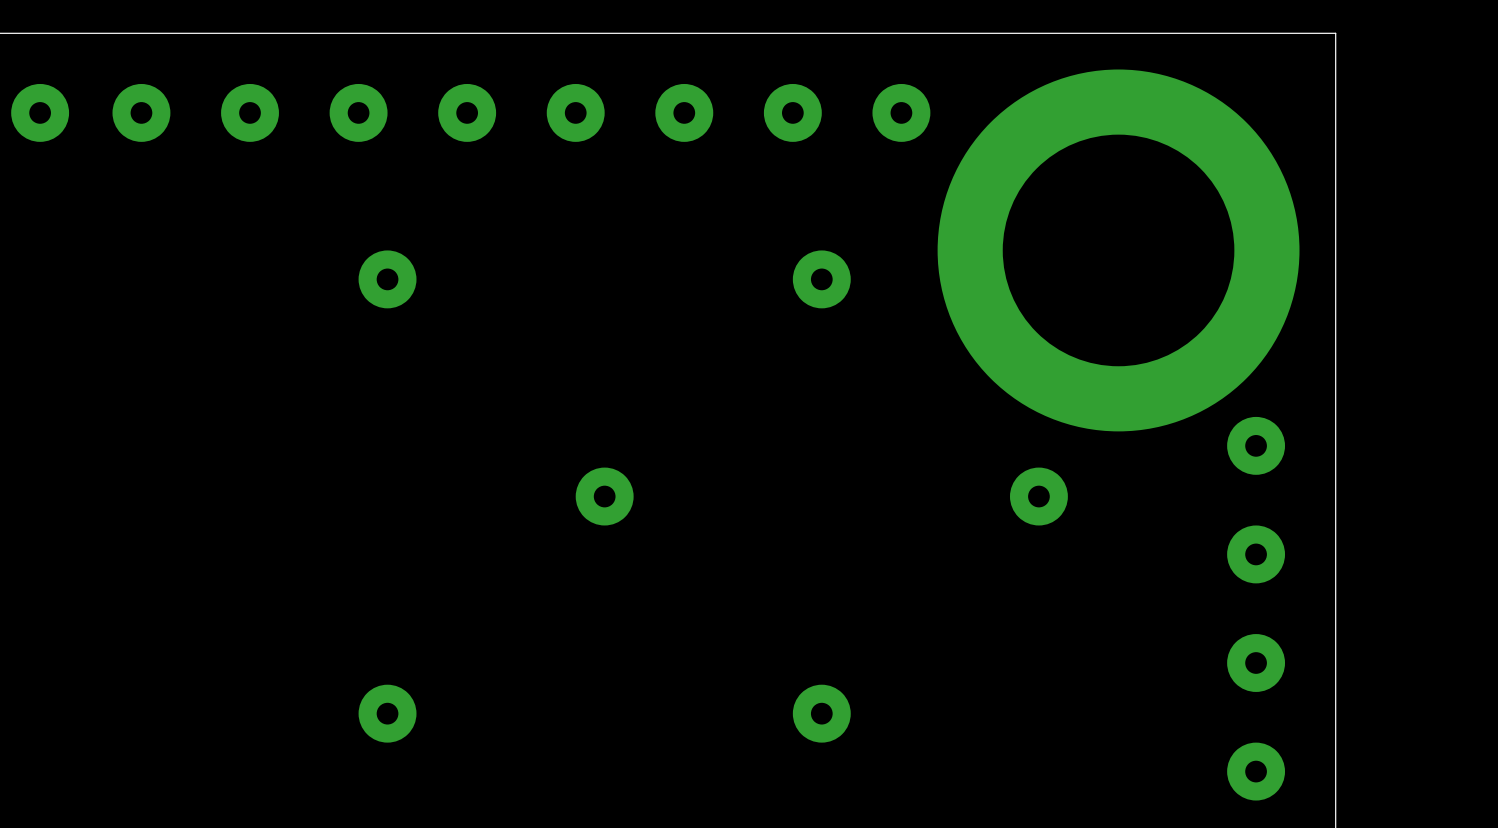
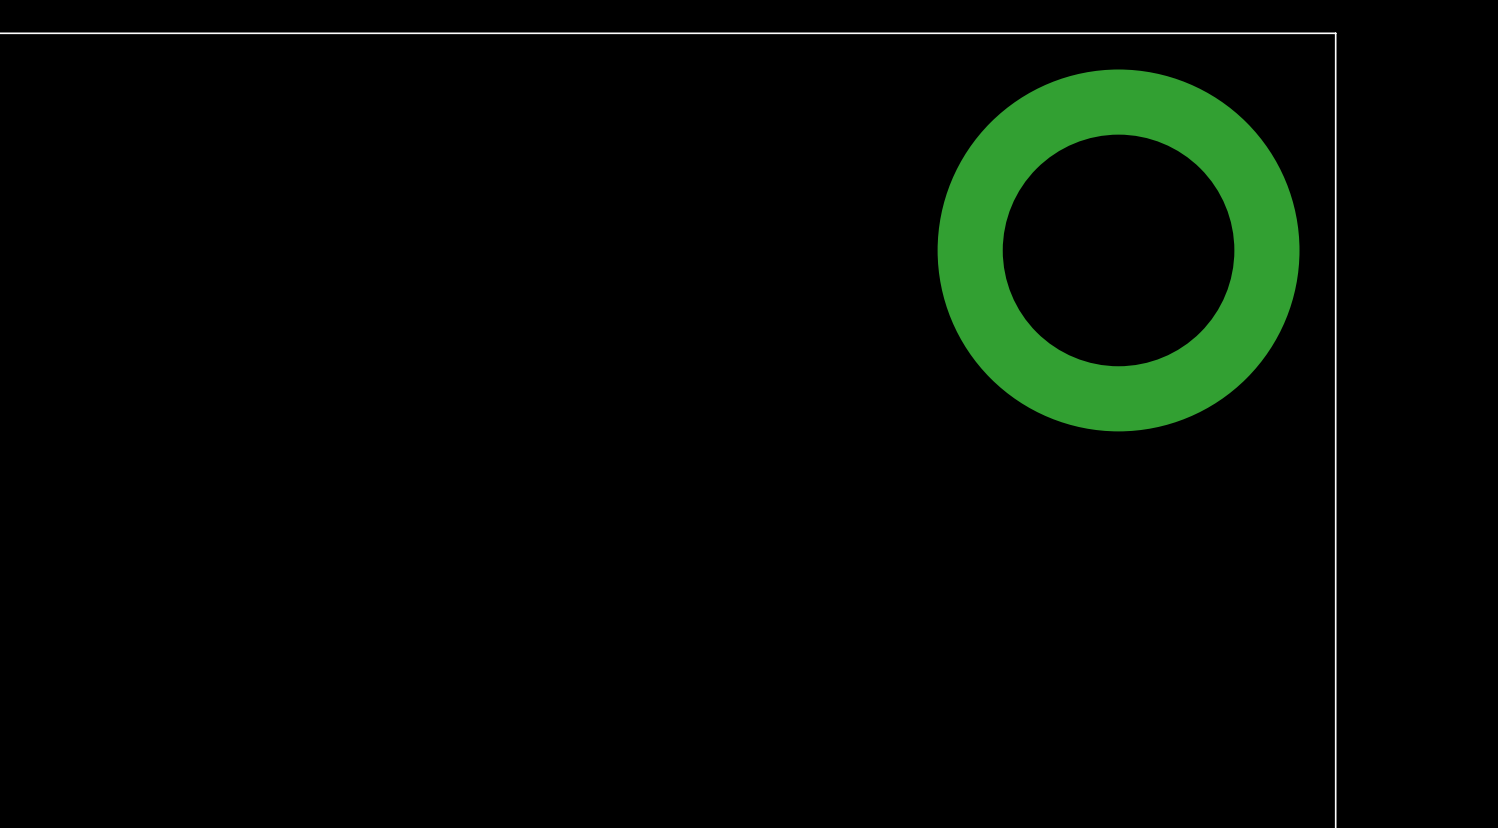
via: (40, 112) -> none
via: (141, 112) -> none
via: (250, 112) -> none
via: (358, 112) -> none
via: (467, 112) -> none
via: (575, 112) -> none
via: (684, 112) -> none
via: (792, 112) -> none
via: (901, 112) -> none
via: (387, 279) -> none
via: (821, 279) -> none
via: (1256, 445) -> none
via: (604, 496) -> none
via: (1038, 496) -> none
via: (1256, 554) -> none
via: (1256, 663) -> none
via: (387, 713) -> none
via: (821, 713) -> none
via: (1256, 771) -> none

